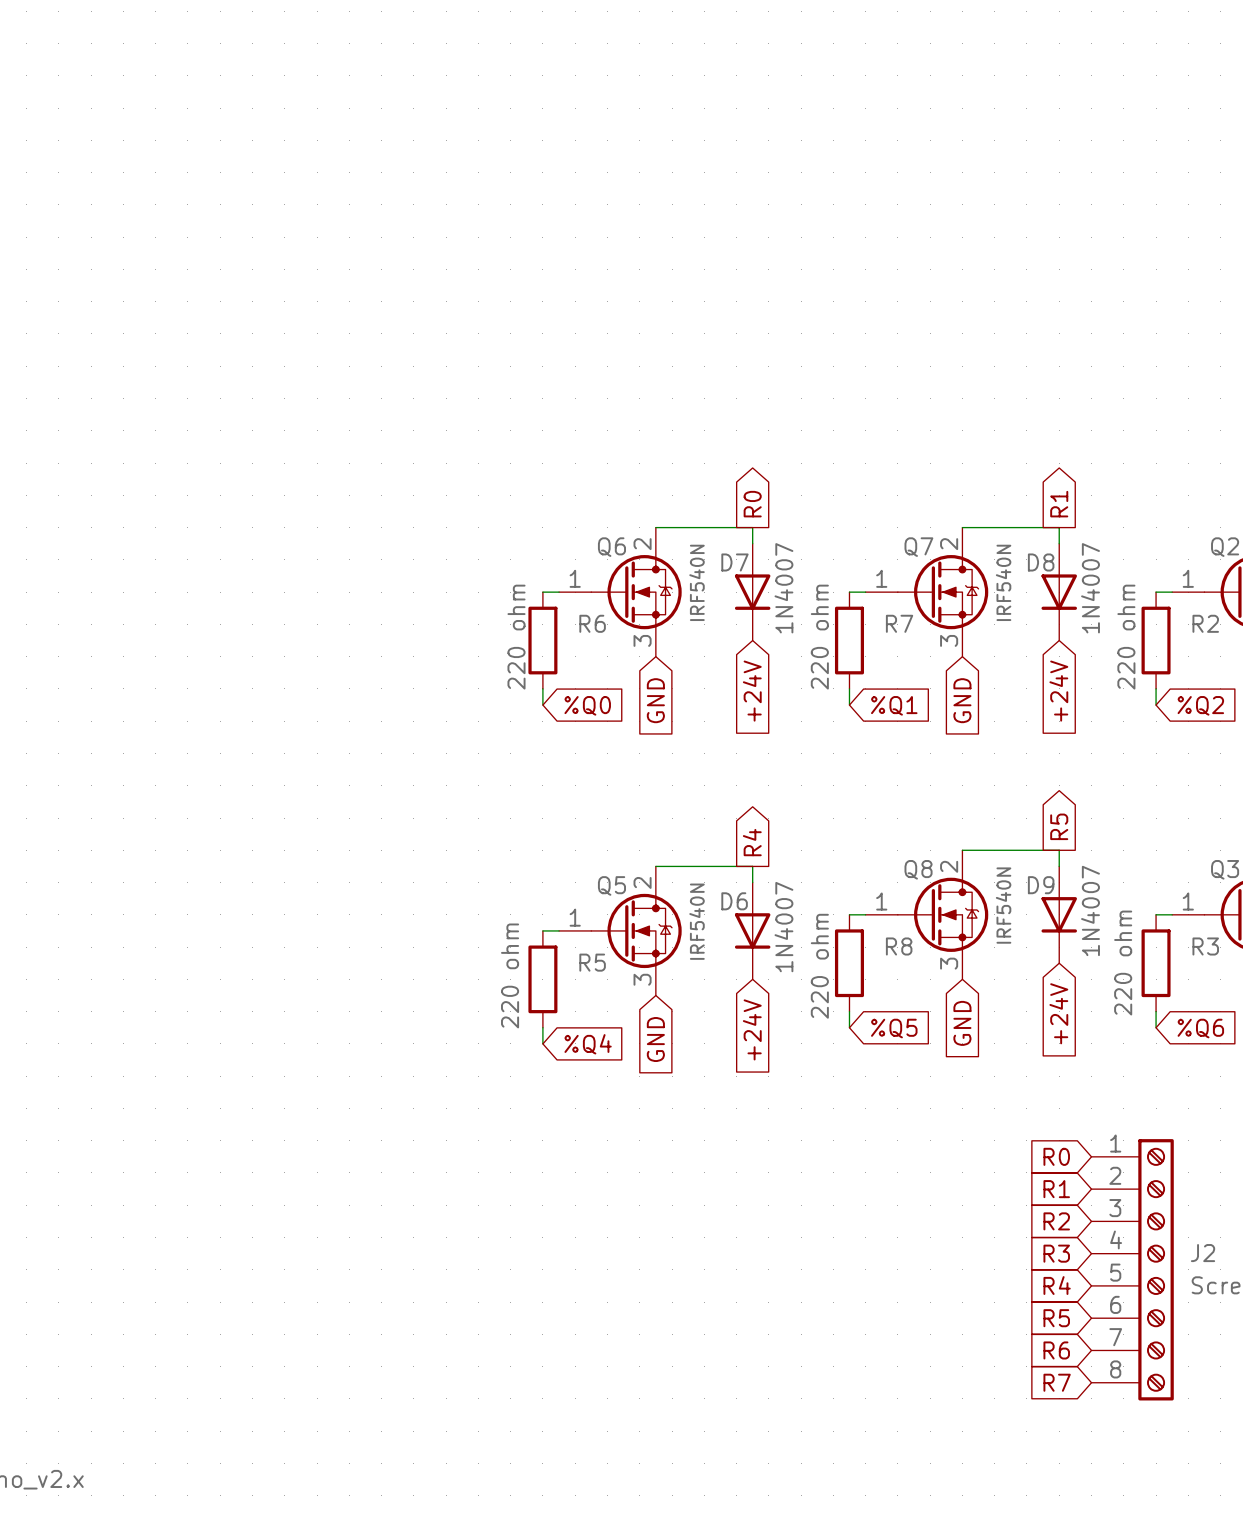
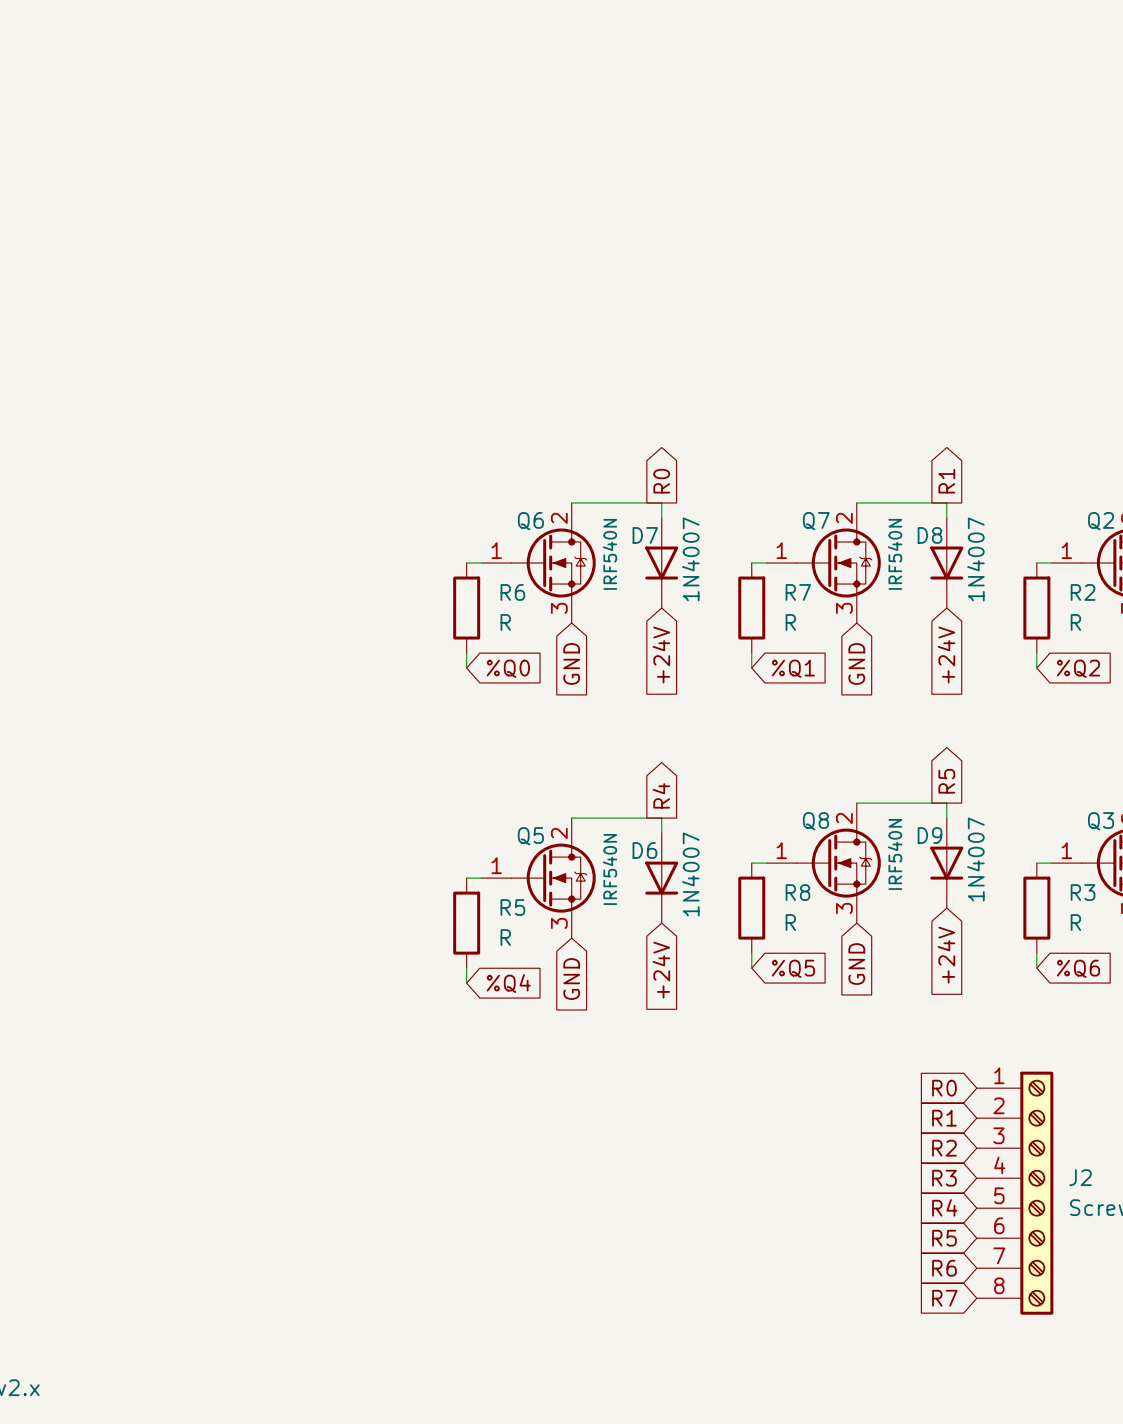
R6 value: 220 ohm (516, 637) -> R (505, 622)
R7 value: 220 ohm (819, 637) -> R (790, 622)
R2 value: 220 ohm (1126, 637) -> R (1075, 622)
R3 value: 220 ohm (1123, 963) -> R (1075, 922)
R8 value: 220 ohm (819, 966) -> R (790, 922)
R5 value: 220 ohm (510, 975) -> R (505, 937)

